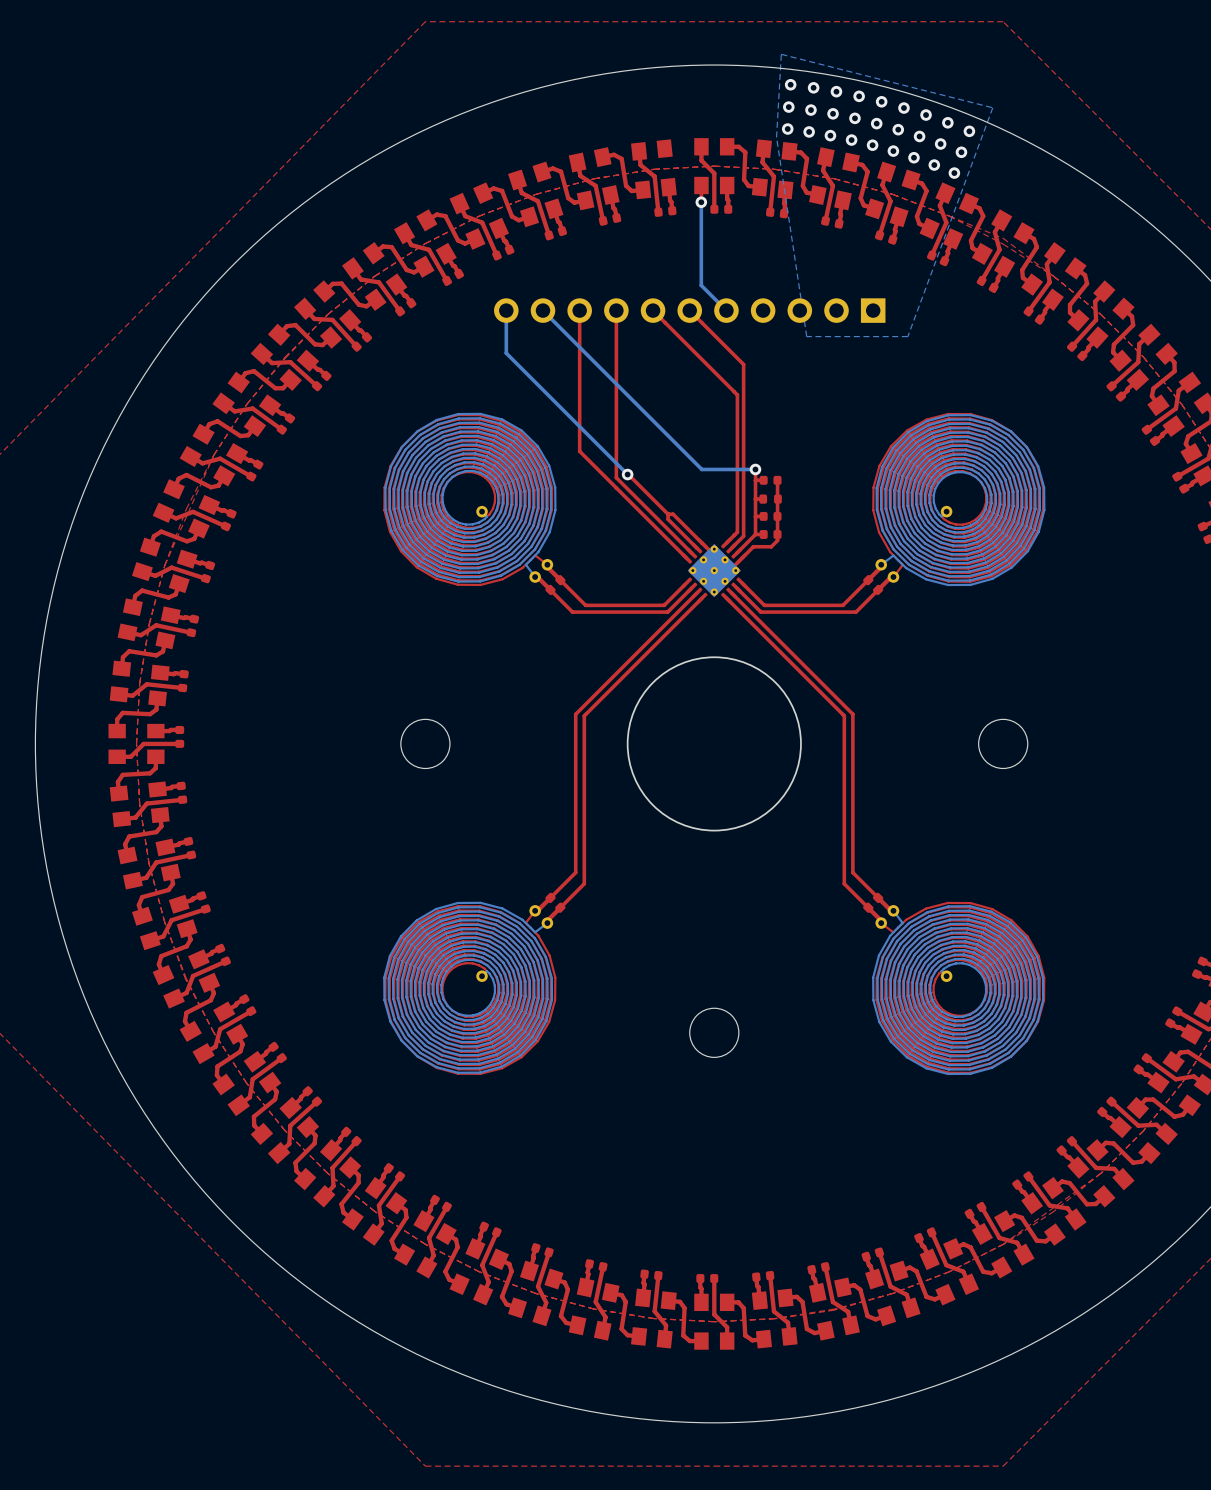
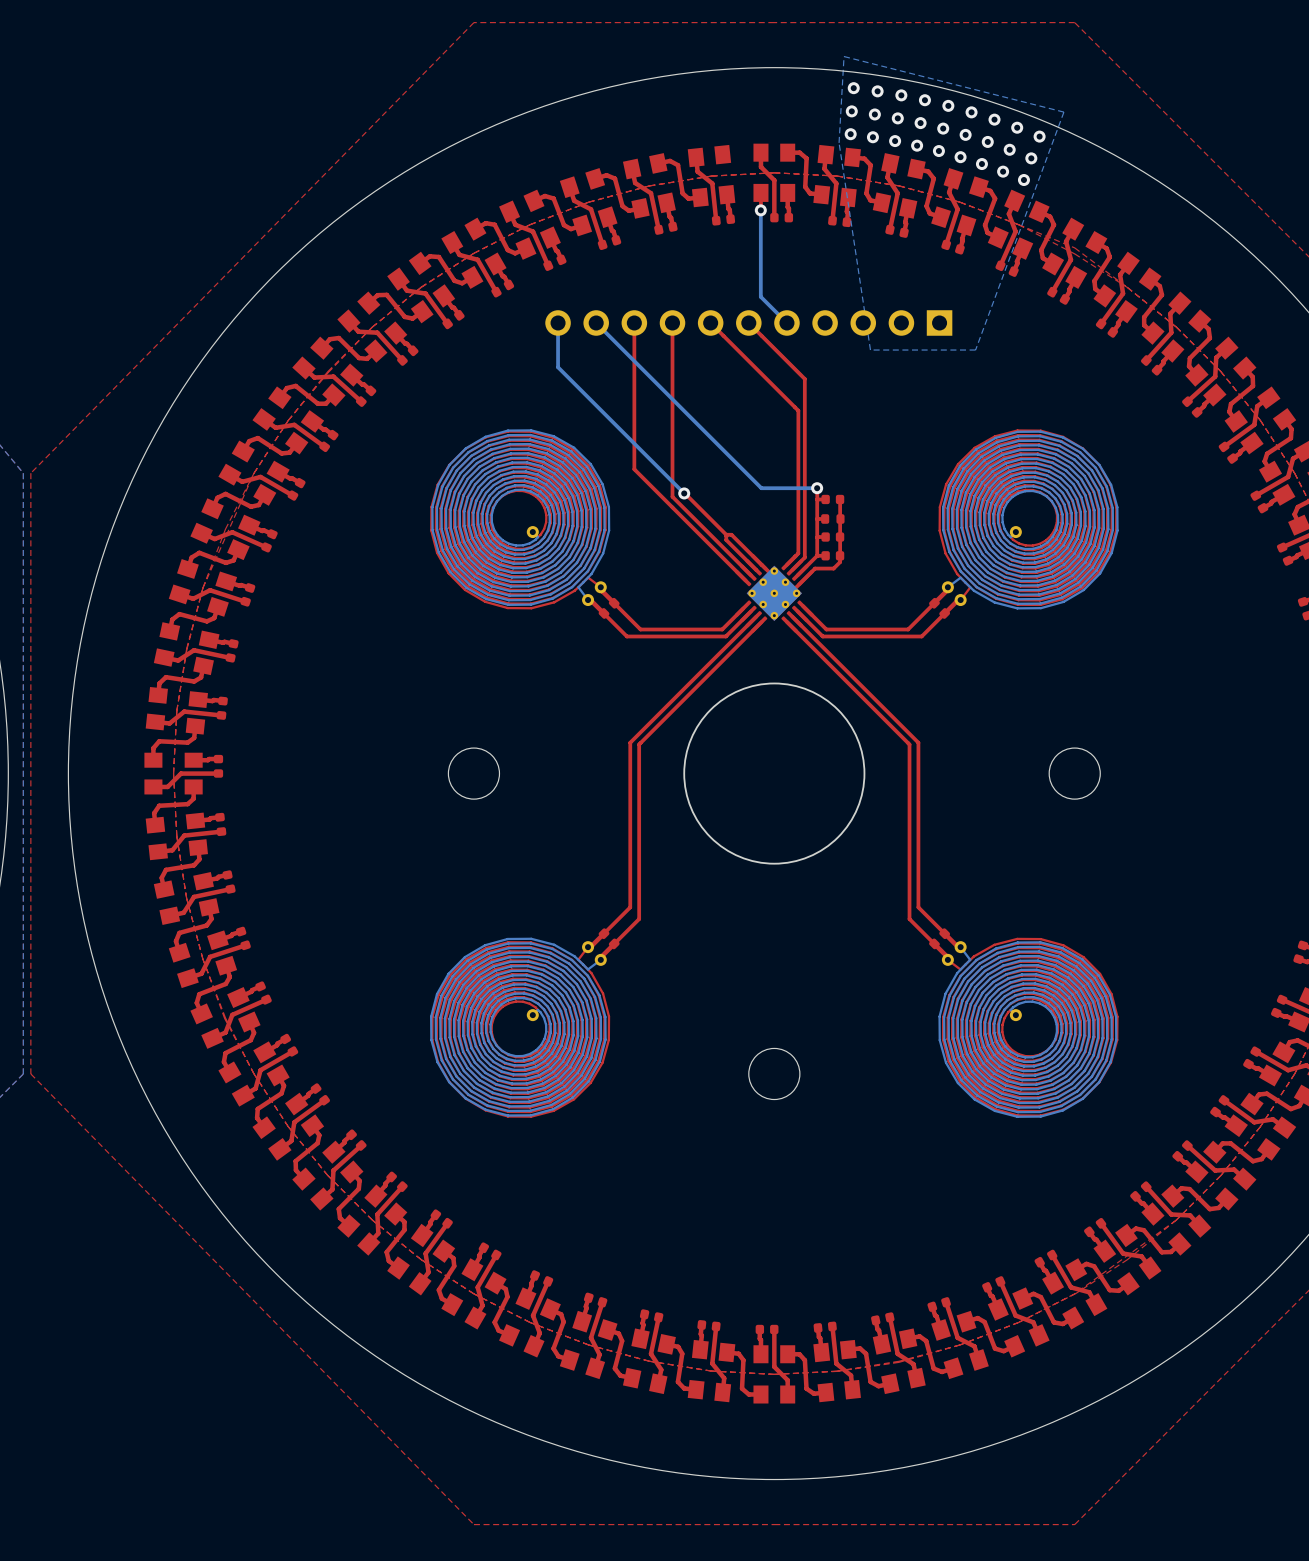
part footprint: [681, 537, 748, 604] -> [734, 553, 814, 633]

